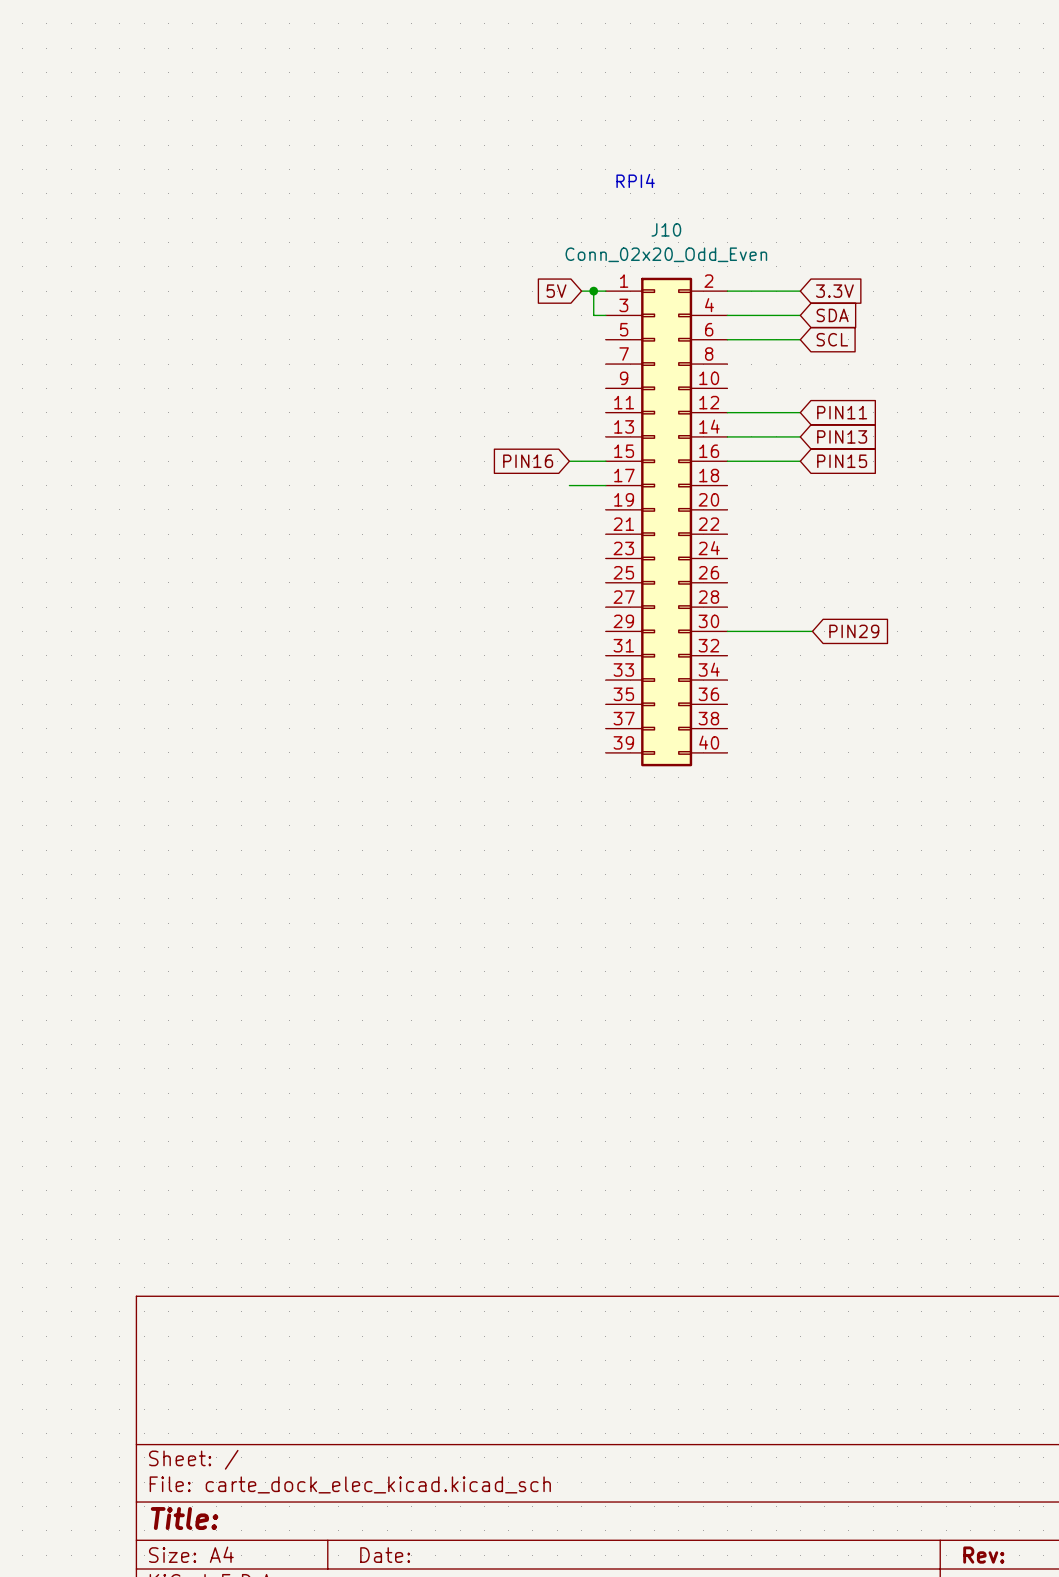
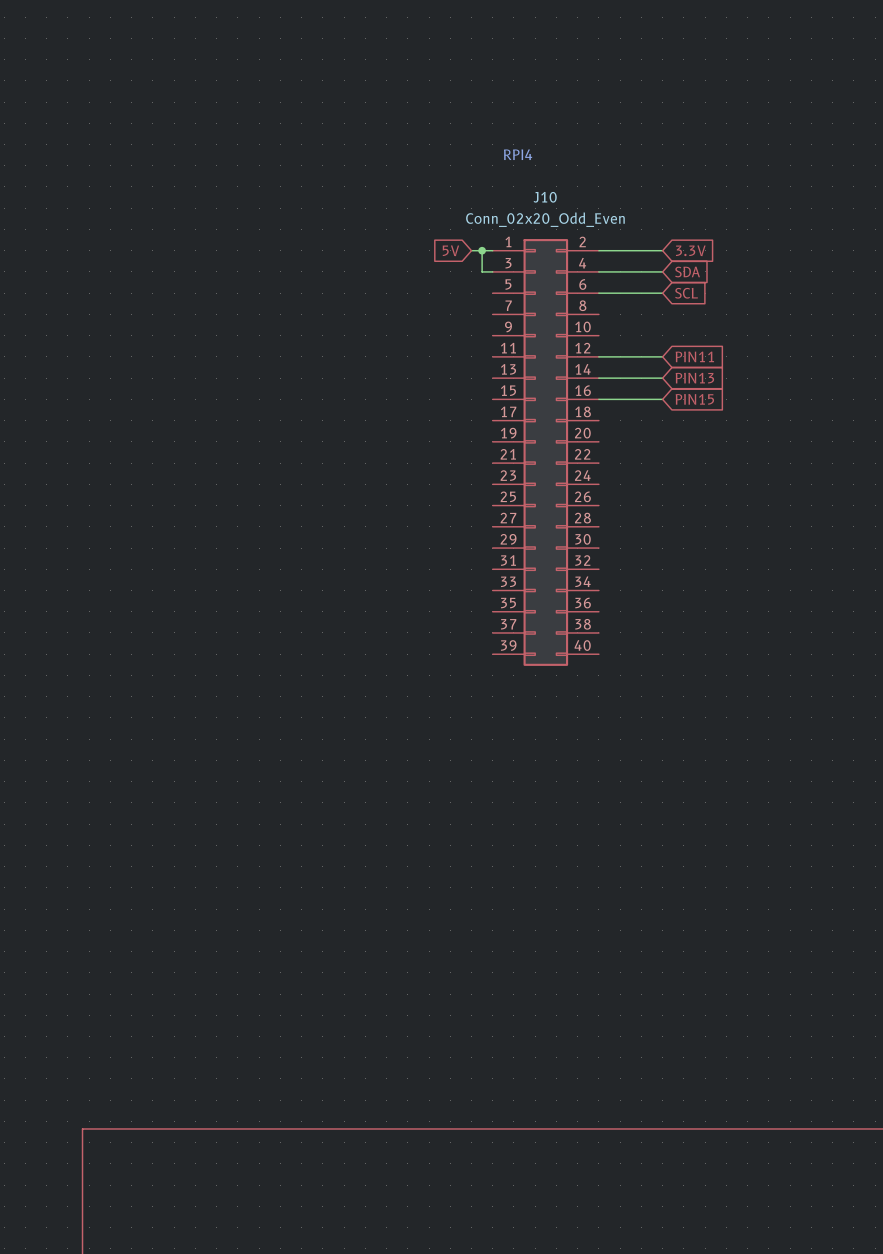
global label: PIN16 (528, 461) -> none
wire: (569, 461) (605, 461) -> none
wire: (569, 485) (605, 485) -> none
wire: (727, 631) (812, 631) -> none
global label: PIN29 (854, 631) -> none

